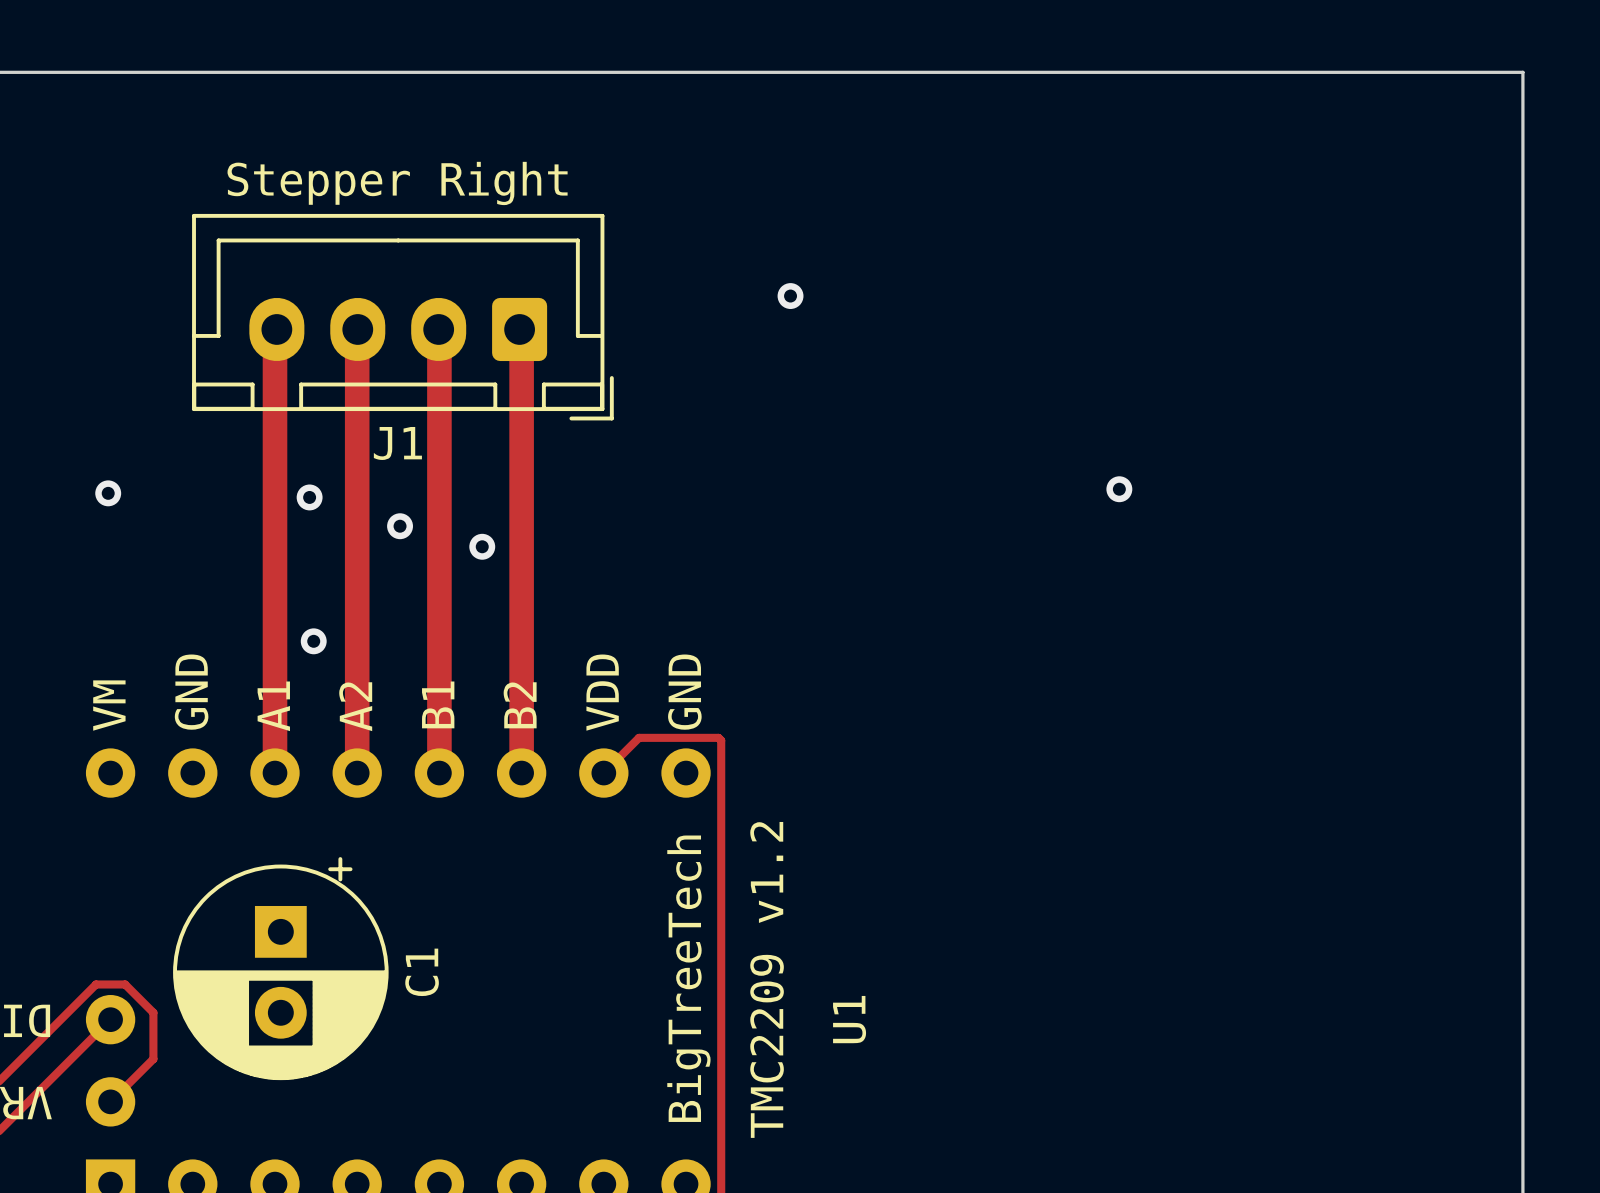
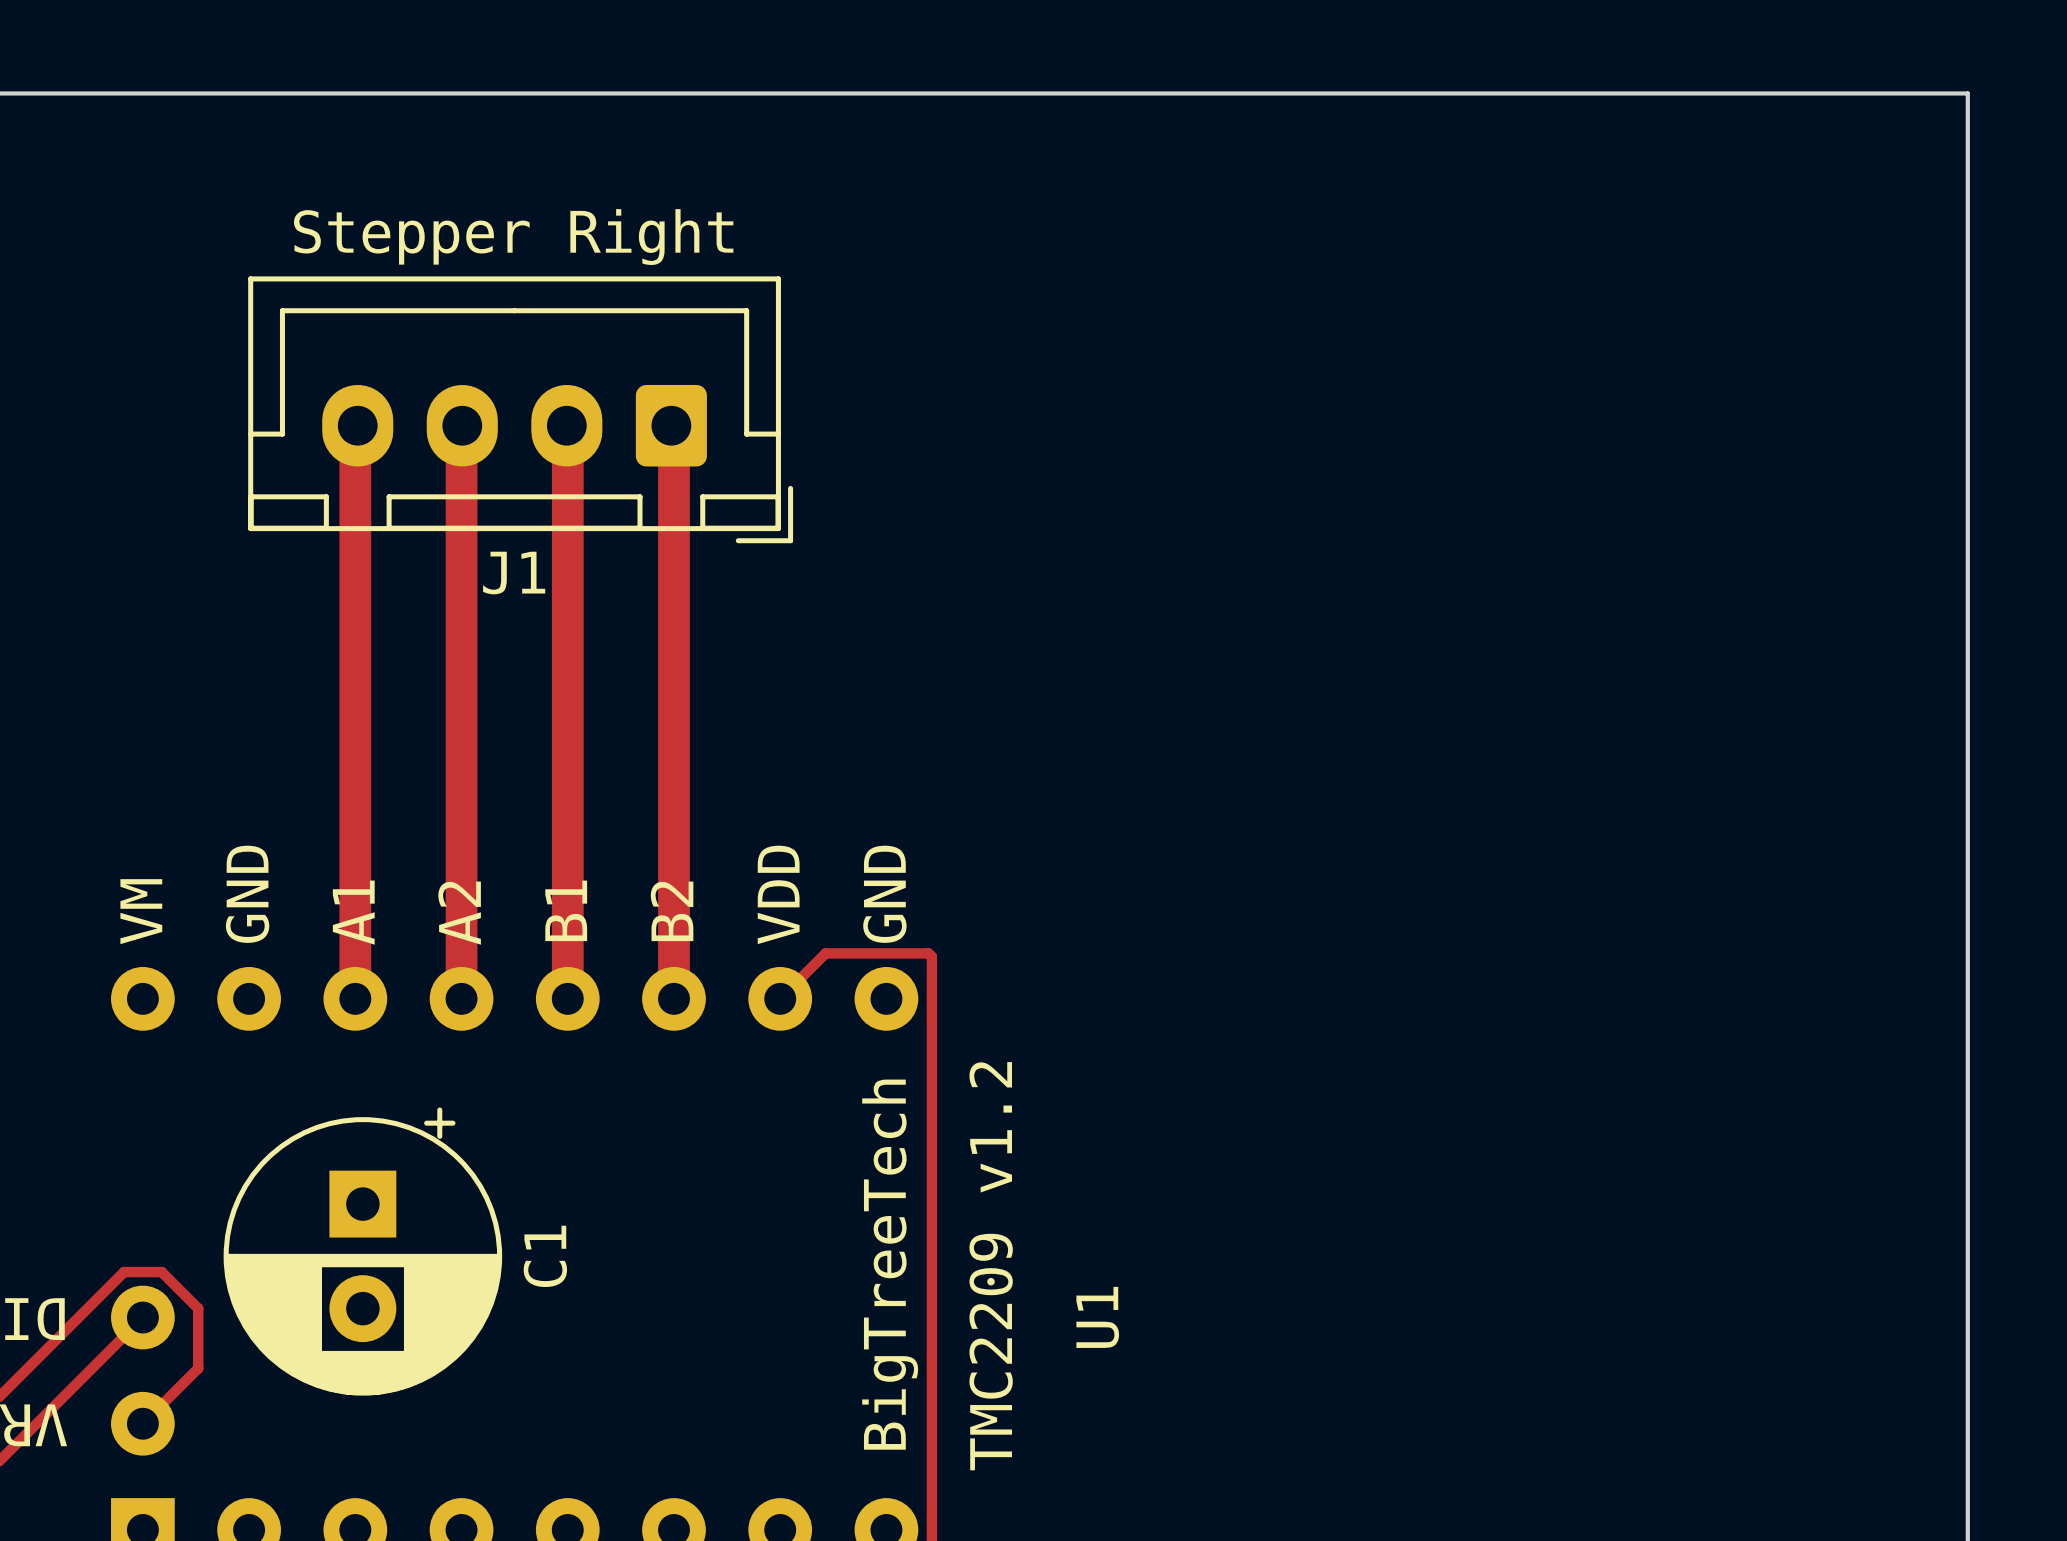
via: (790, 296) -> none
via: (1119, 489) -> none
via: (108, 493) -> none
via: (309, 497) -> none
via: (400, 526) -> none
via: (482, 546) -> none
via: (313, 641) -> none

